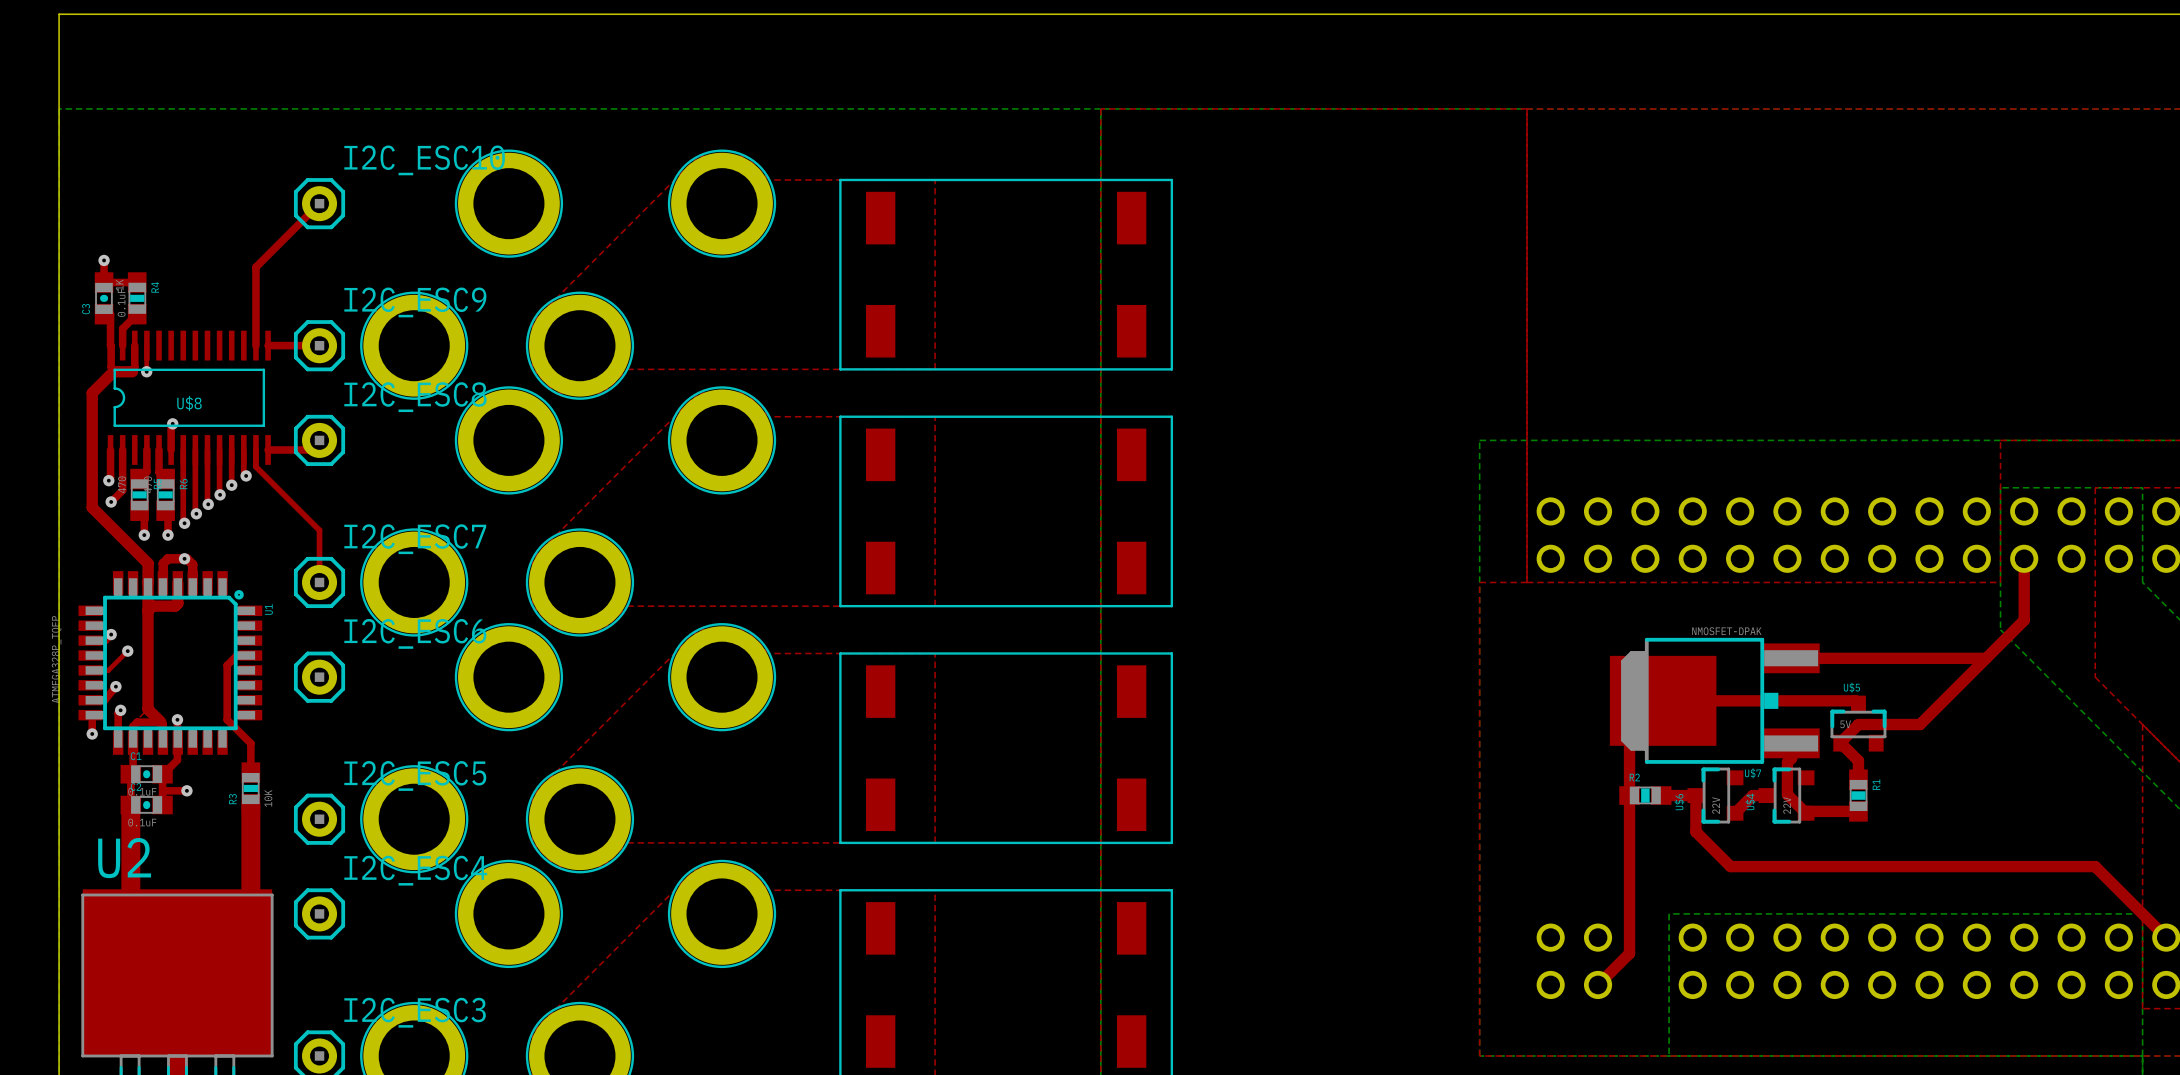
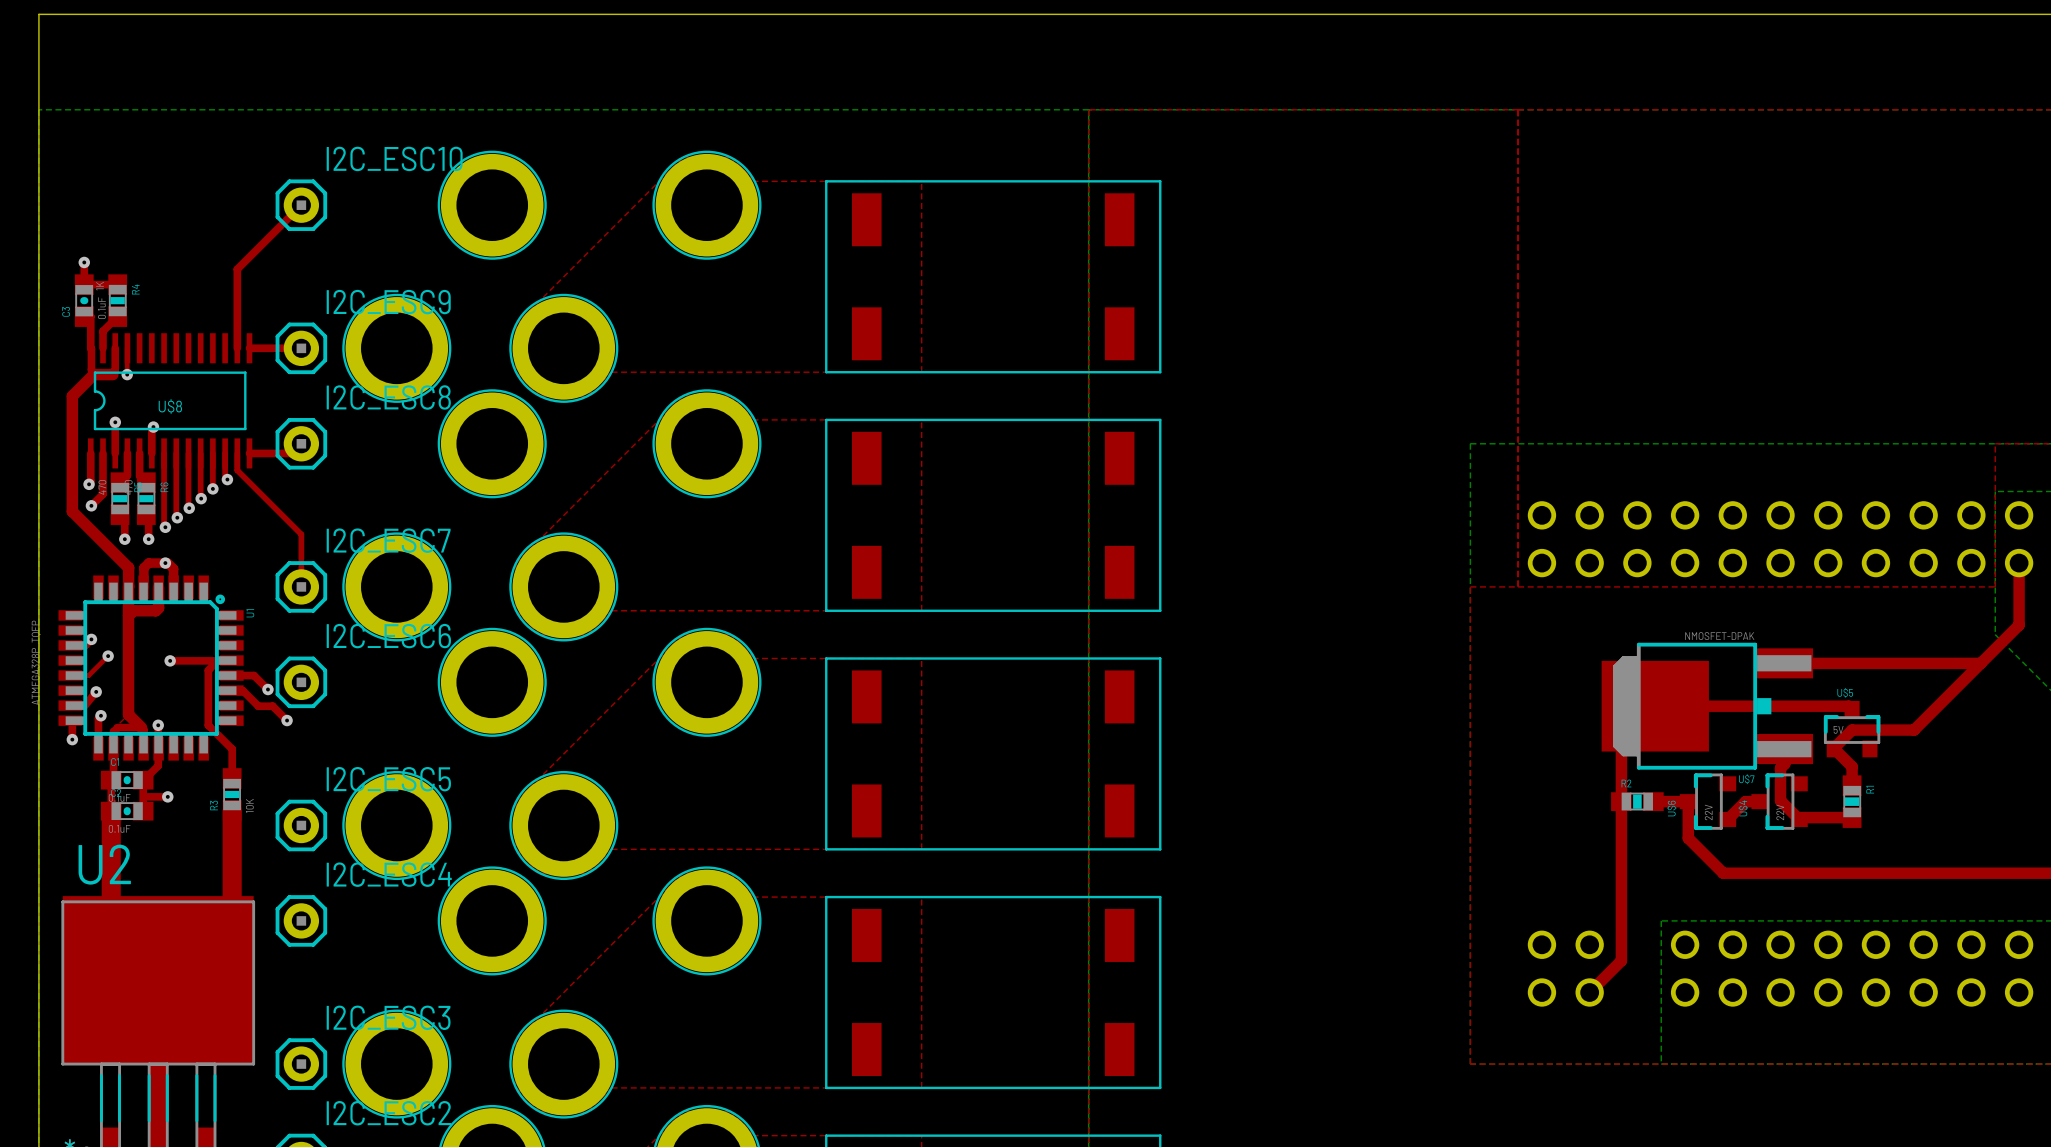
top track: none -> (115, 422) (115, 453)
via: none -> (115, 422)
top track: none -> (170, 660) (217, 660)
via: none -> (170, 660)
top track: none -> (231, 675) (254, 675) (267, 689)
via: none -> (267, 689)
top track: none -> (231, 690) (242, 690) (258, 706) (272, 706) (287, 720)
via: none -> (287, 720)

